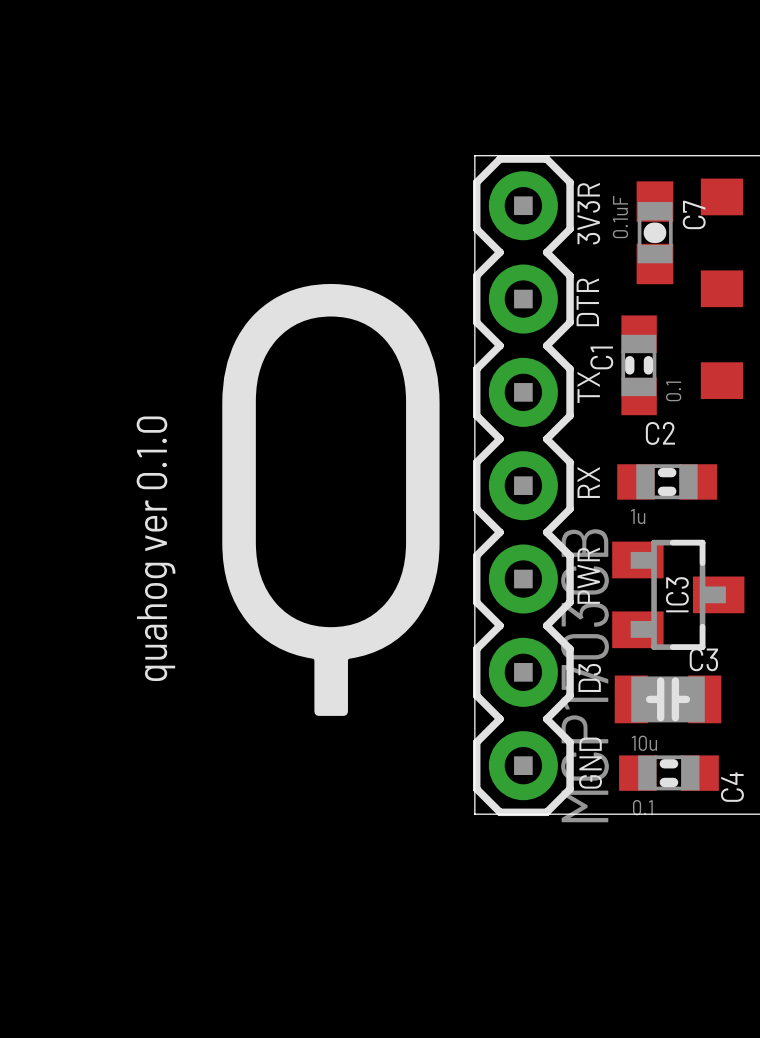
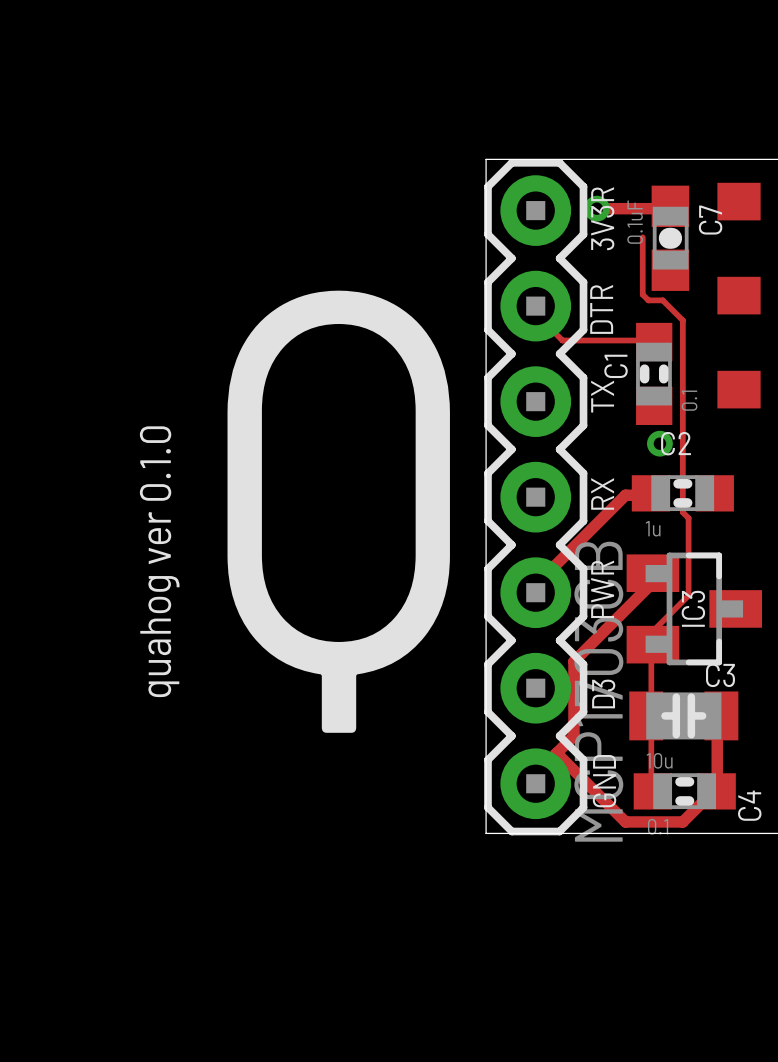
track: none -> (670, 206) (668, 208) (596, 208)
via: none -> (596, 208)
track: none -> (642, 237) (642, 294) (648, 300) (662, 300) (682, 320) (682, 512) (688, 518) (688, 595) (654, 629) (654, 644) (651, 647) (651, 715) (646, 715)
track: none -> (526, 306) (562, 340) (654, 341)
via: none -> (659, 443)
track: none -> (650, 493) (648, 495) (625, 495) (526, 592)
track: none -> (652, 573) (651, 584) (573, 661) (573, 735) (526, 783)
track: none -> (648, 715) (651, 718) (652, 791)
track: none -> (721, 715) (717, 718) (717, 790) (711, 793) (682, 821) (625, 821) (556, 753)

